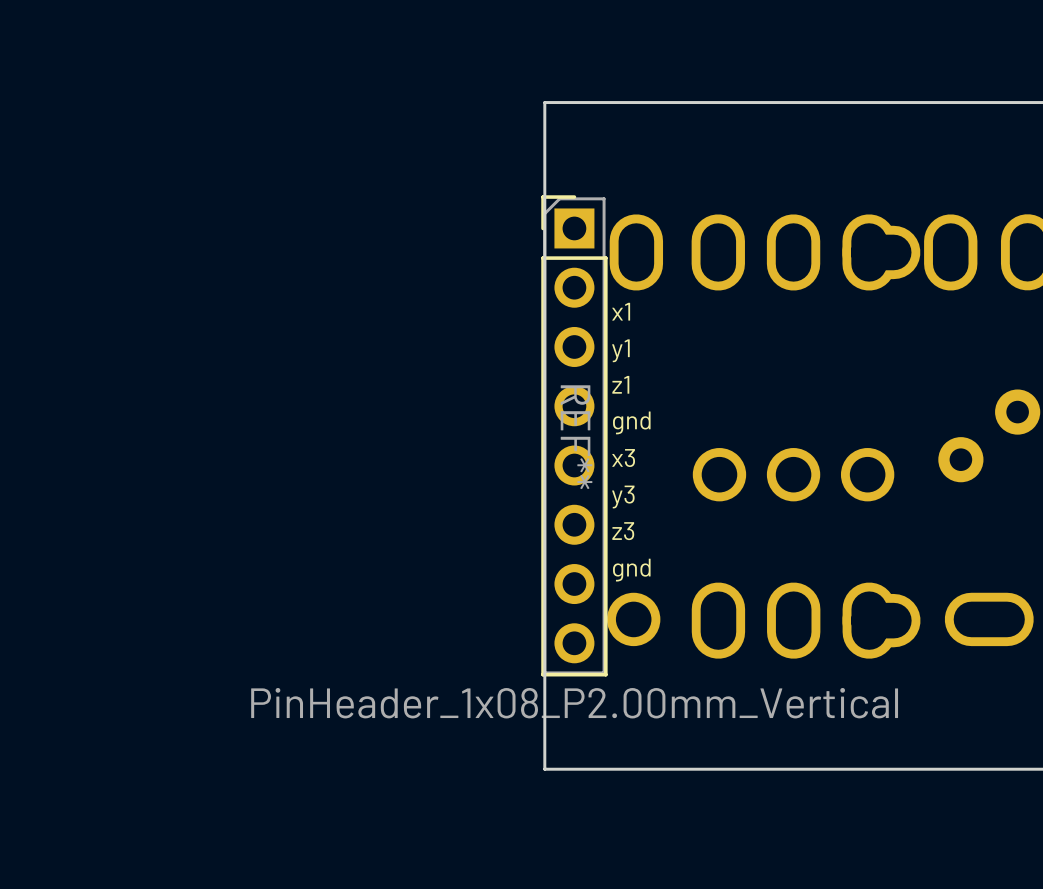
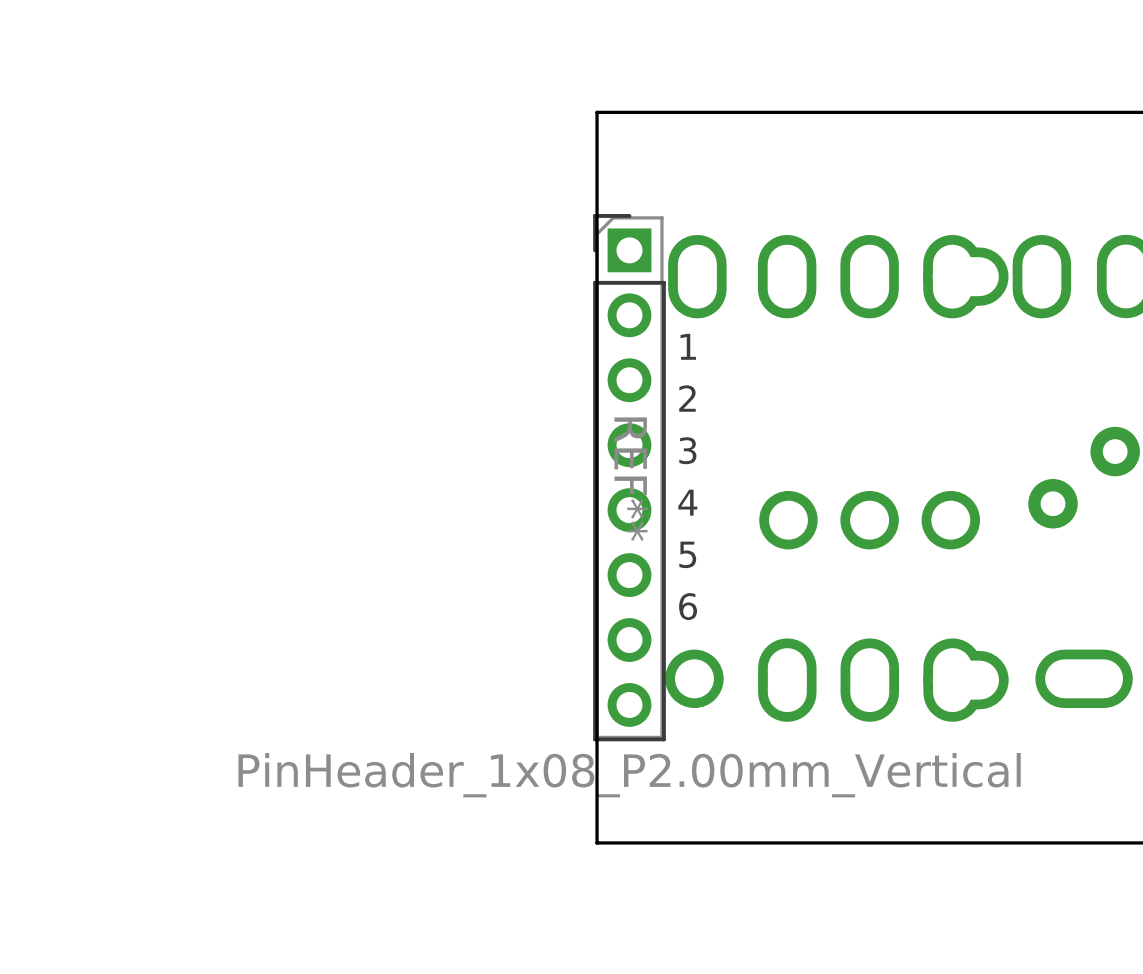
text: x1 (621, 311) -> 1 (688, 346)
text: y1 (620, 350) -> none
text: none -> 2 (687, 398)
text: z1 (620, 384) -> none
text: none -> 3 (687, 450)
text: gnd (631, 422) -> none
text: x3 (623, 458) -> 4 (687, 502)
text: y3 (623, 497) -> none
text: none -> 5 (687, 554)
text: z3 (623, 531) -> none
text: none -> 6 (688, 606)
text: gnd (631, 570) -> none

